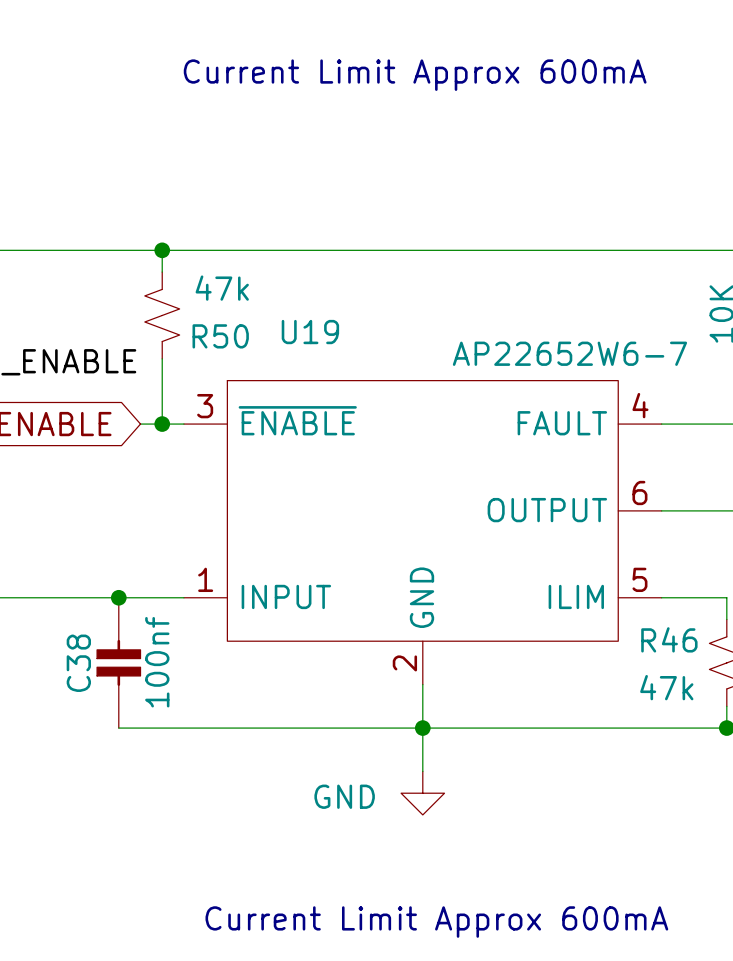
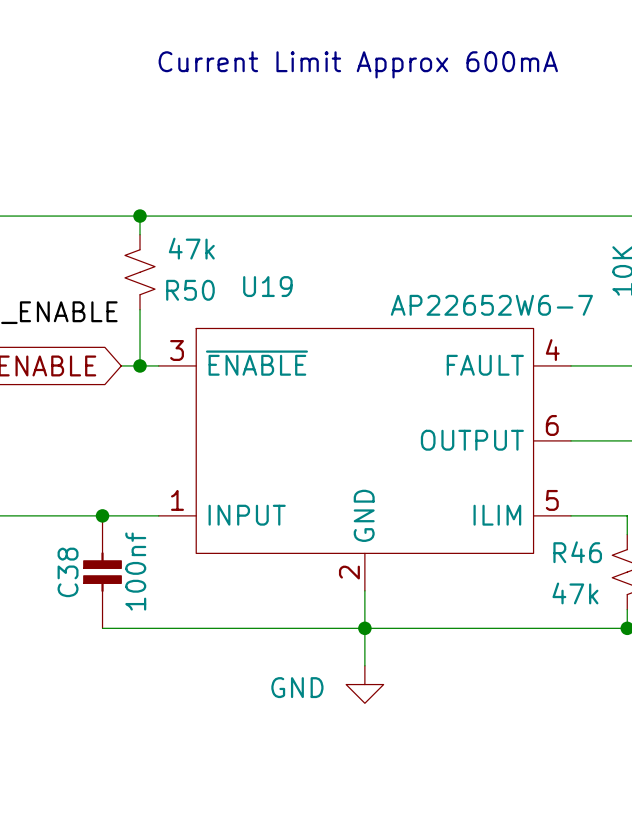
text: Current Limit Approx 600mA (436, 922) -> none

